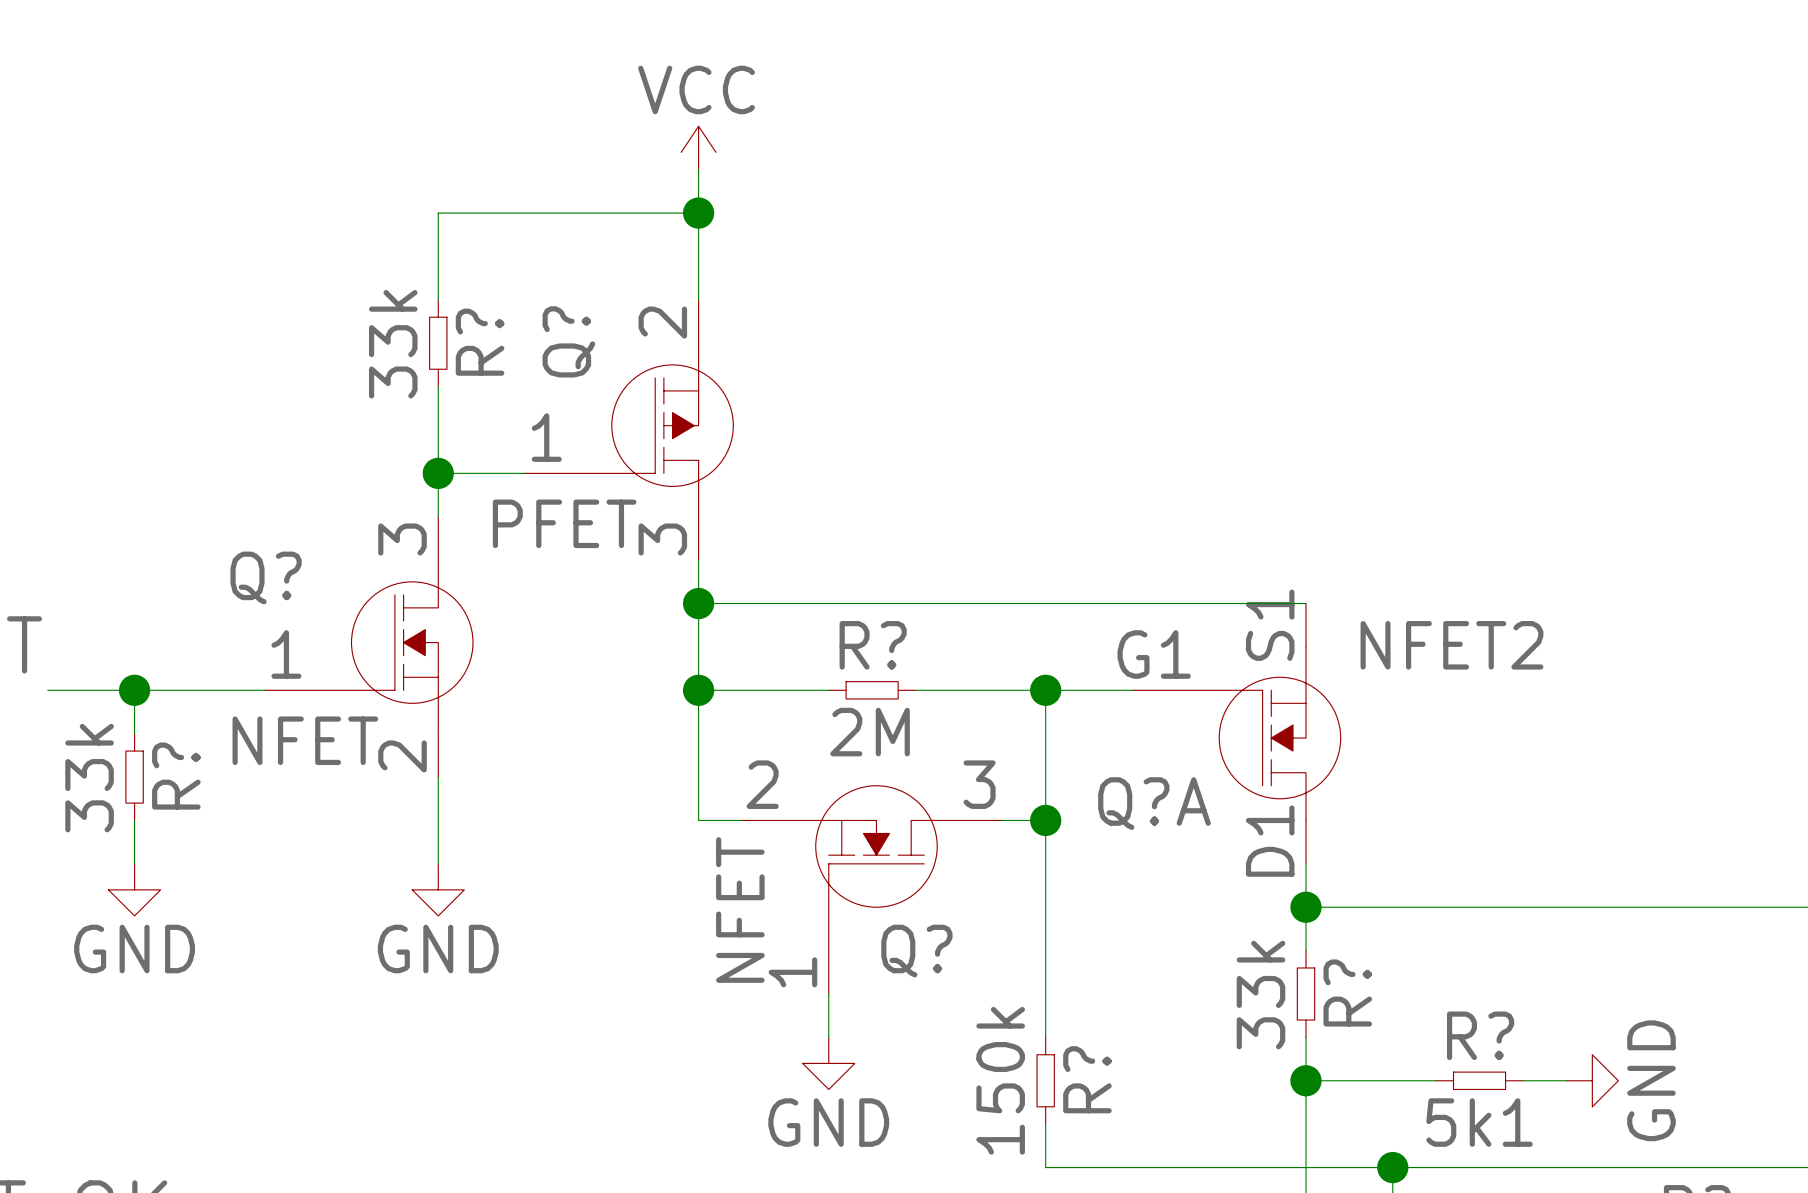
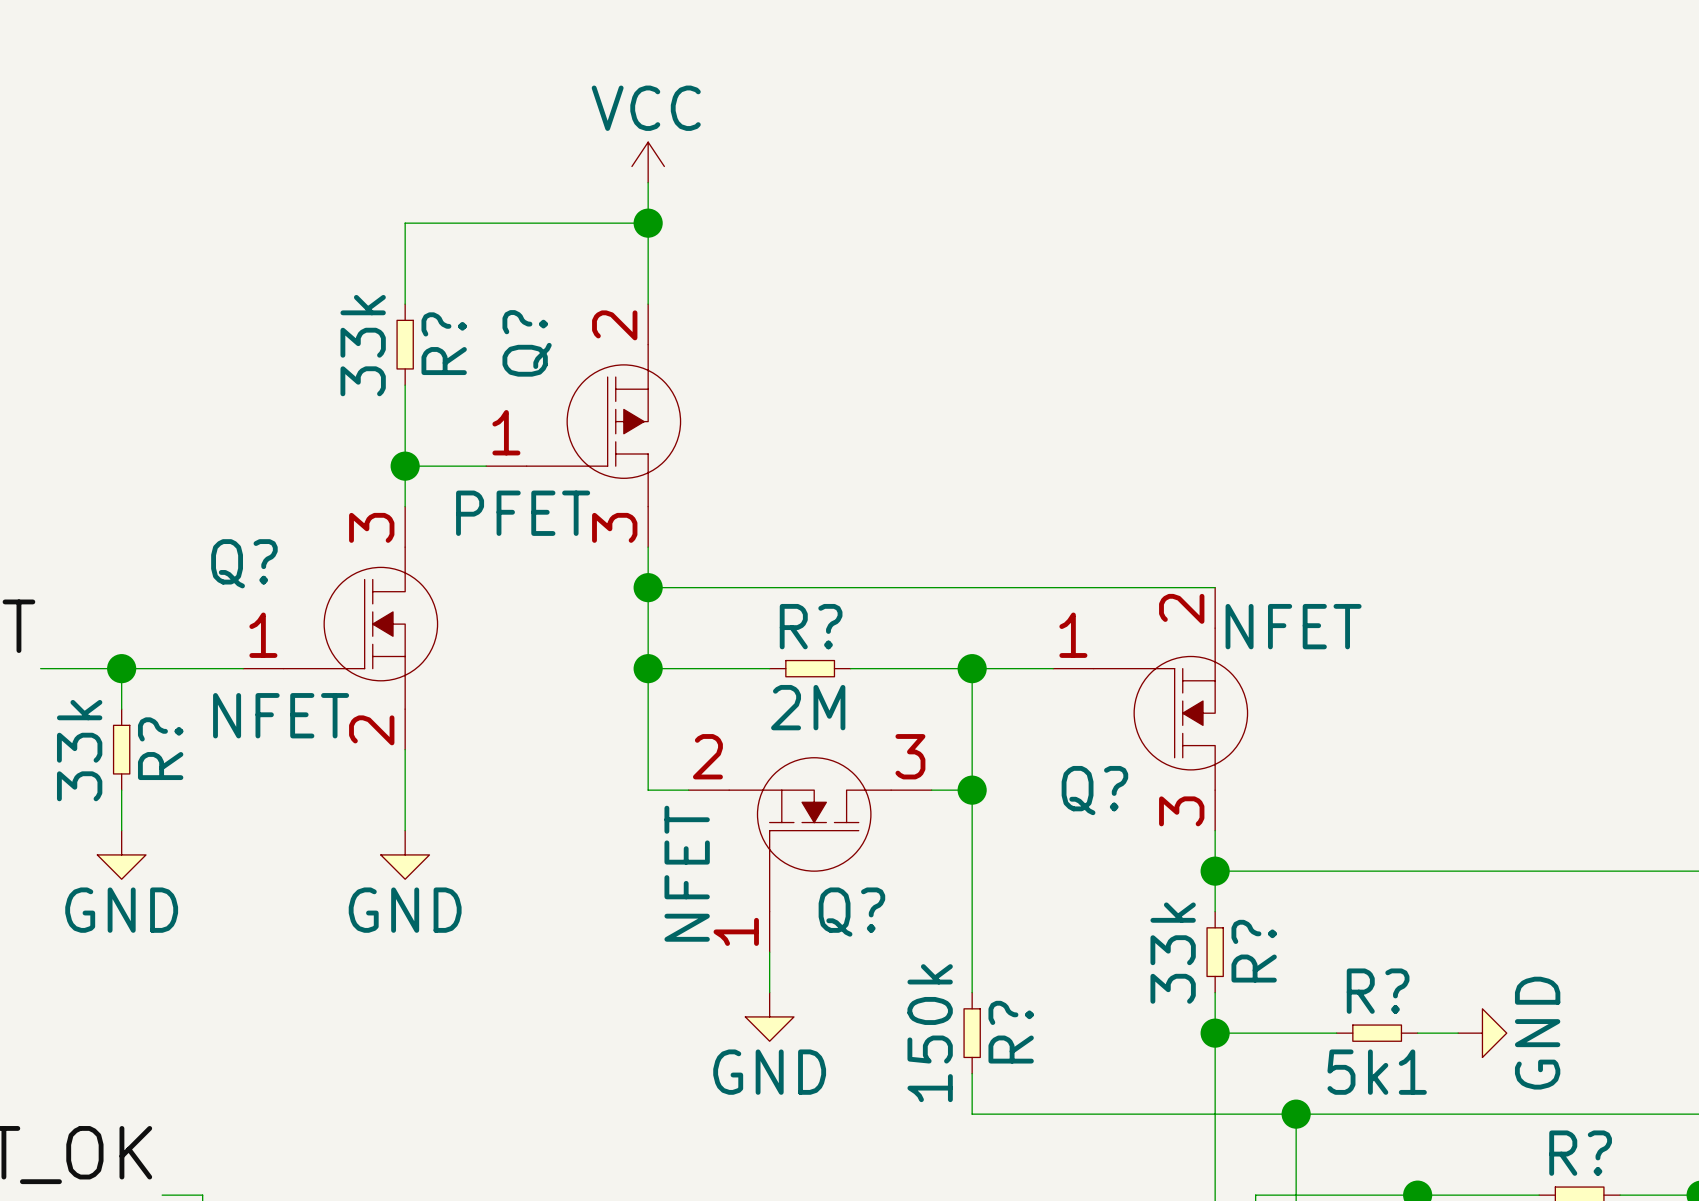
Q?A pin number: S1 (1270, 625) -> 2 (1181, 608)
Q?A value: NFET2 (1451, 645) -> NFET (1293, 626)
Q?A pin number: G1 (1154, 654) -> 1 (1073, 635)
Q?A name: Q?A (1154, 803) -> Q? (1094, 790)
Q?A pin number: D1 (1270, 841) -> 3 (1181, 811)

